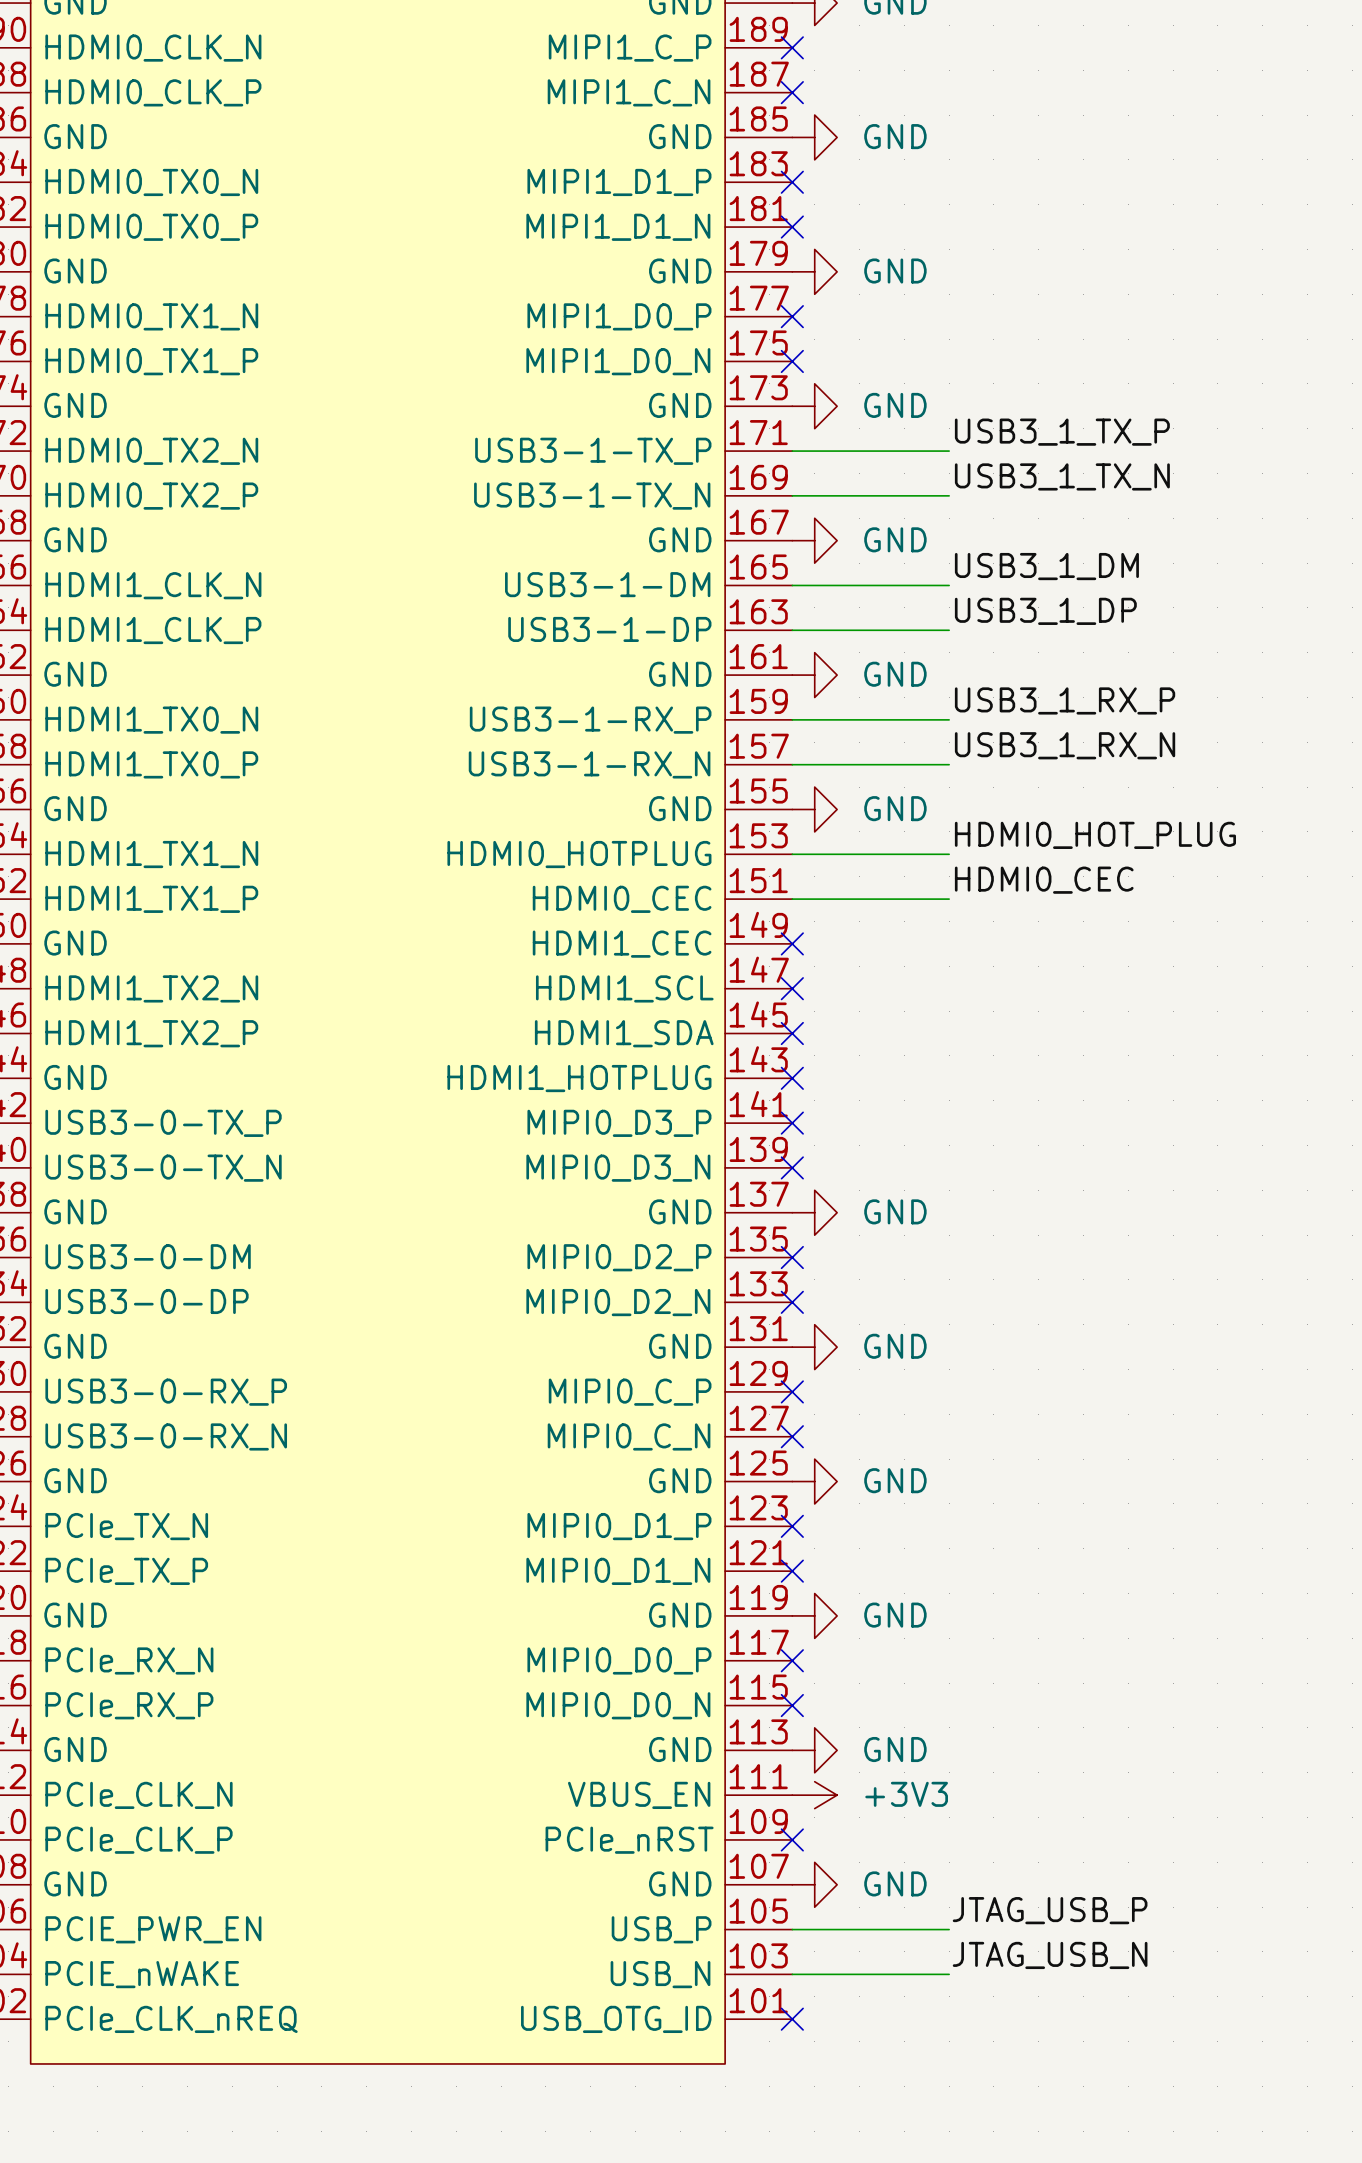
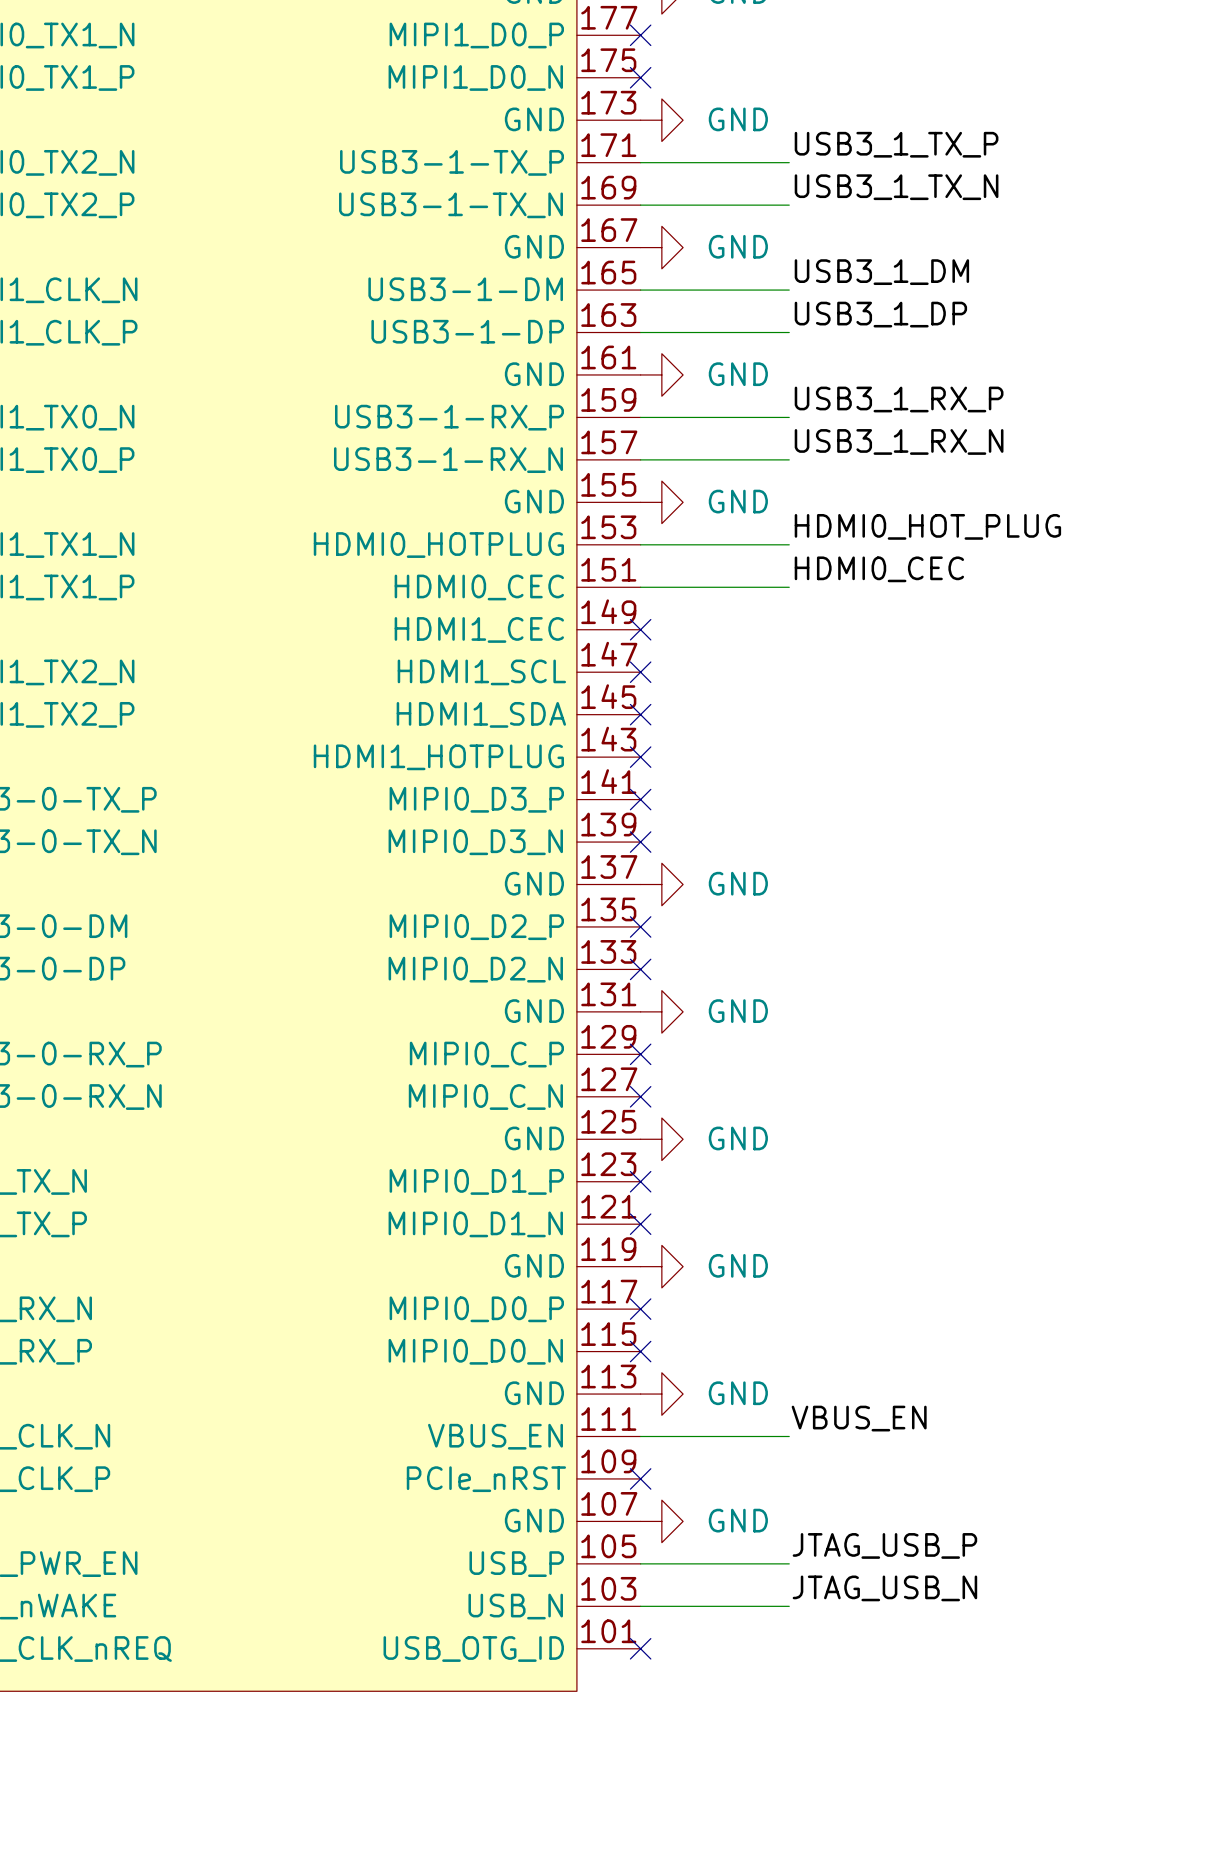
label: none -> VBUS_EN (859, 1418)
wire: none -> (640, 1436) (789, 1436)
power symbol: +3V3 (814, 1795) -> none

